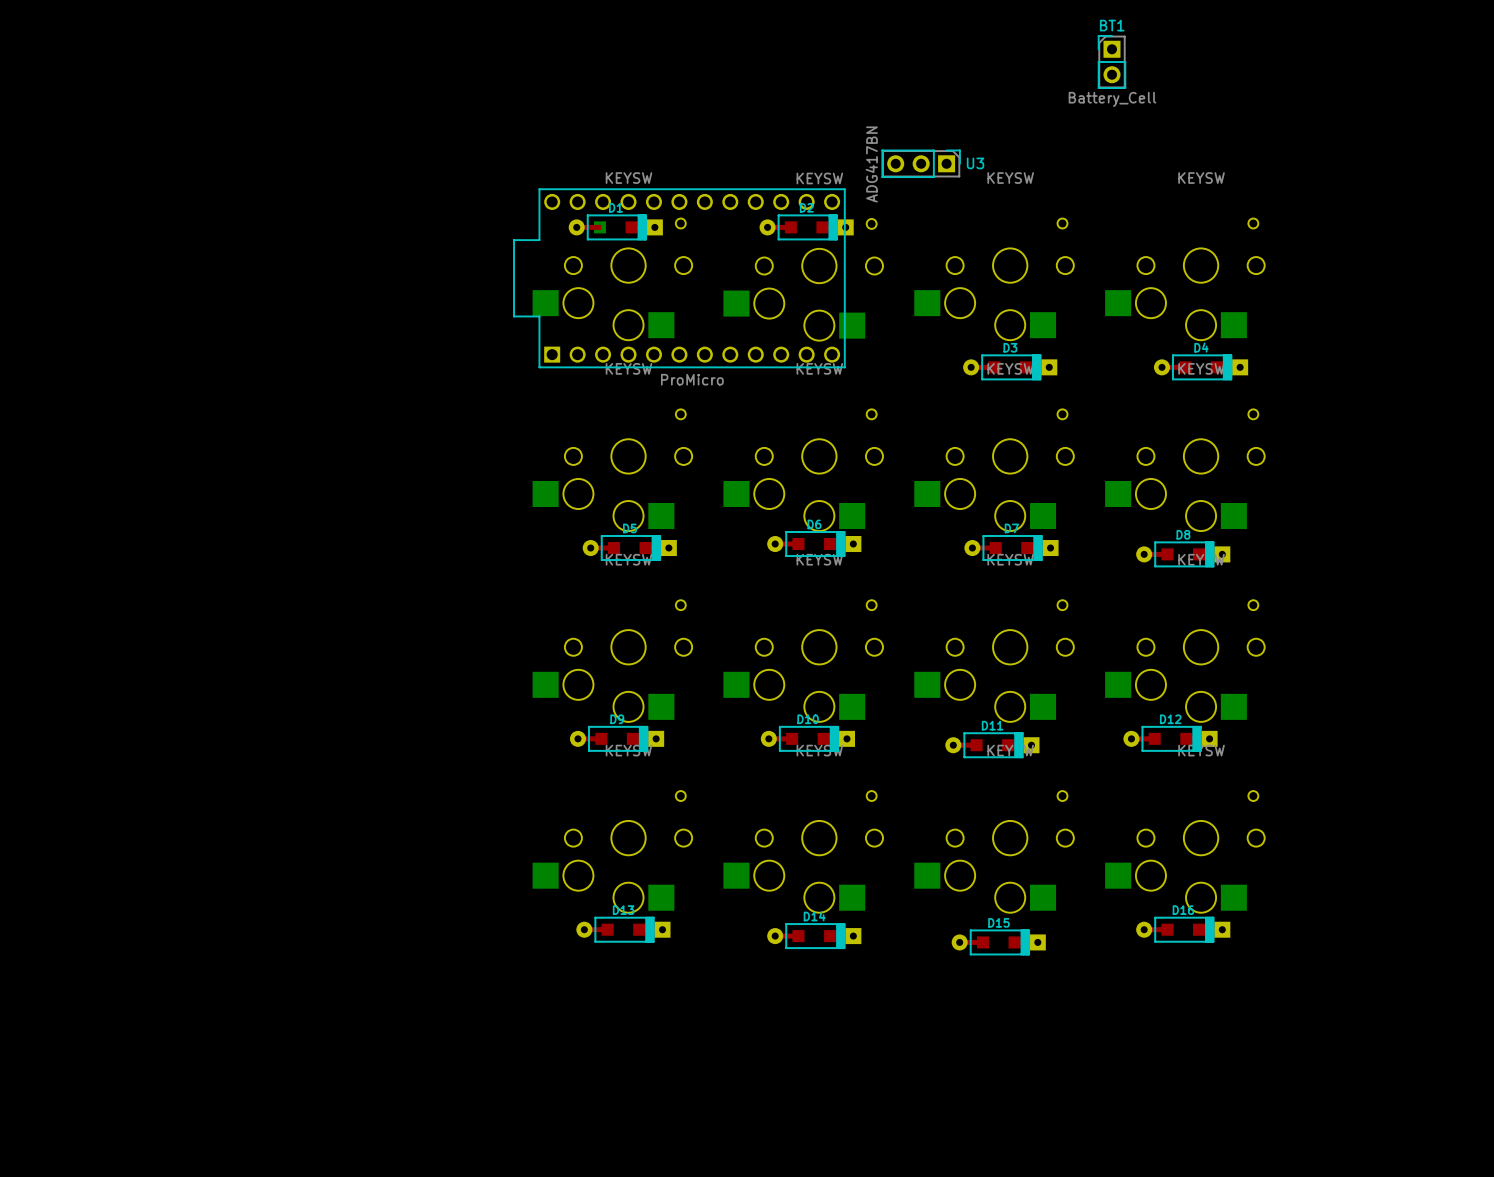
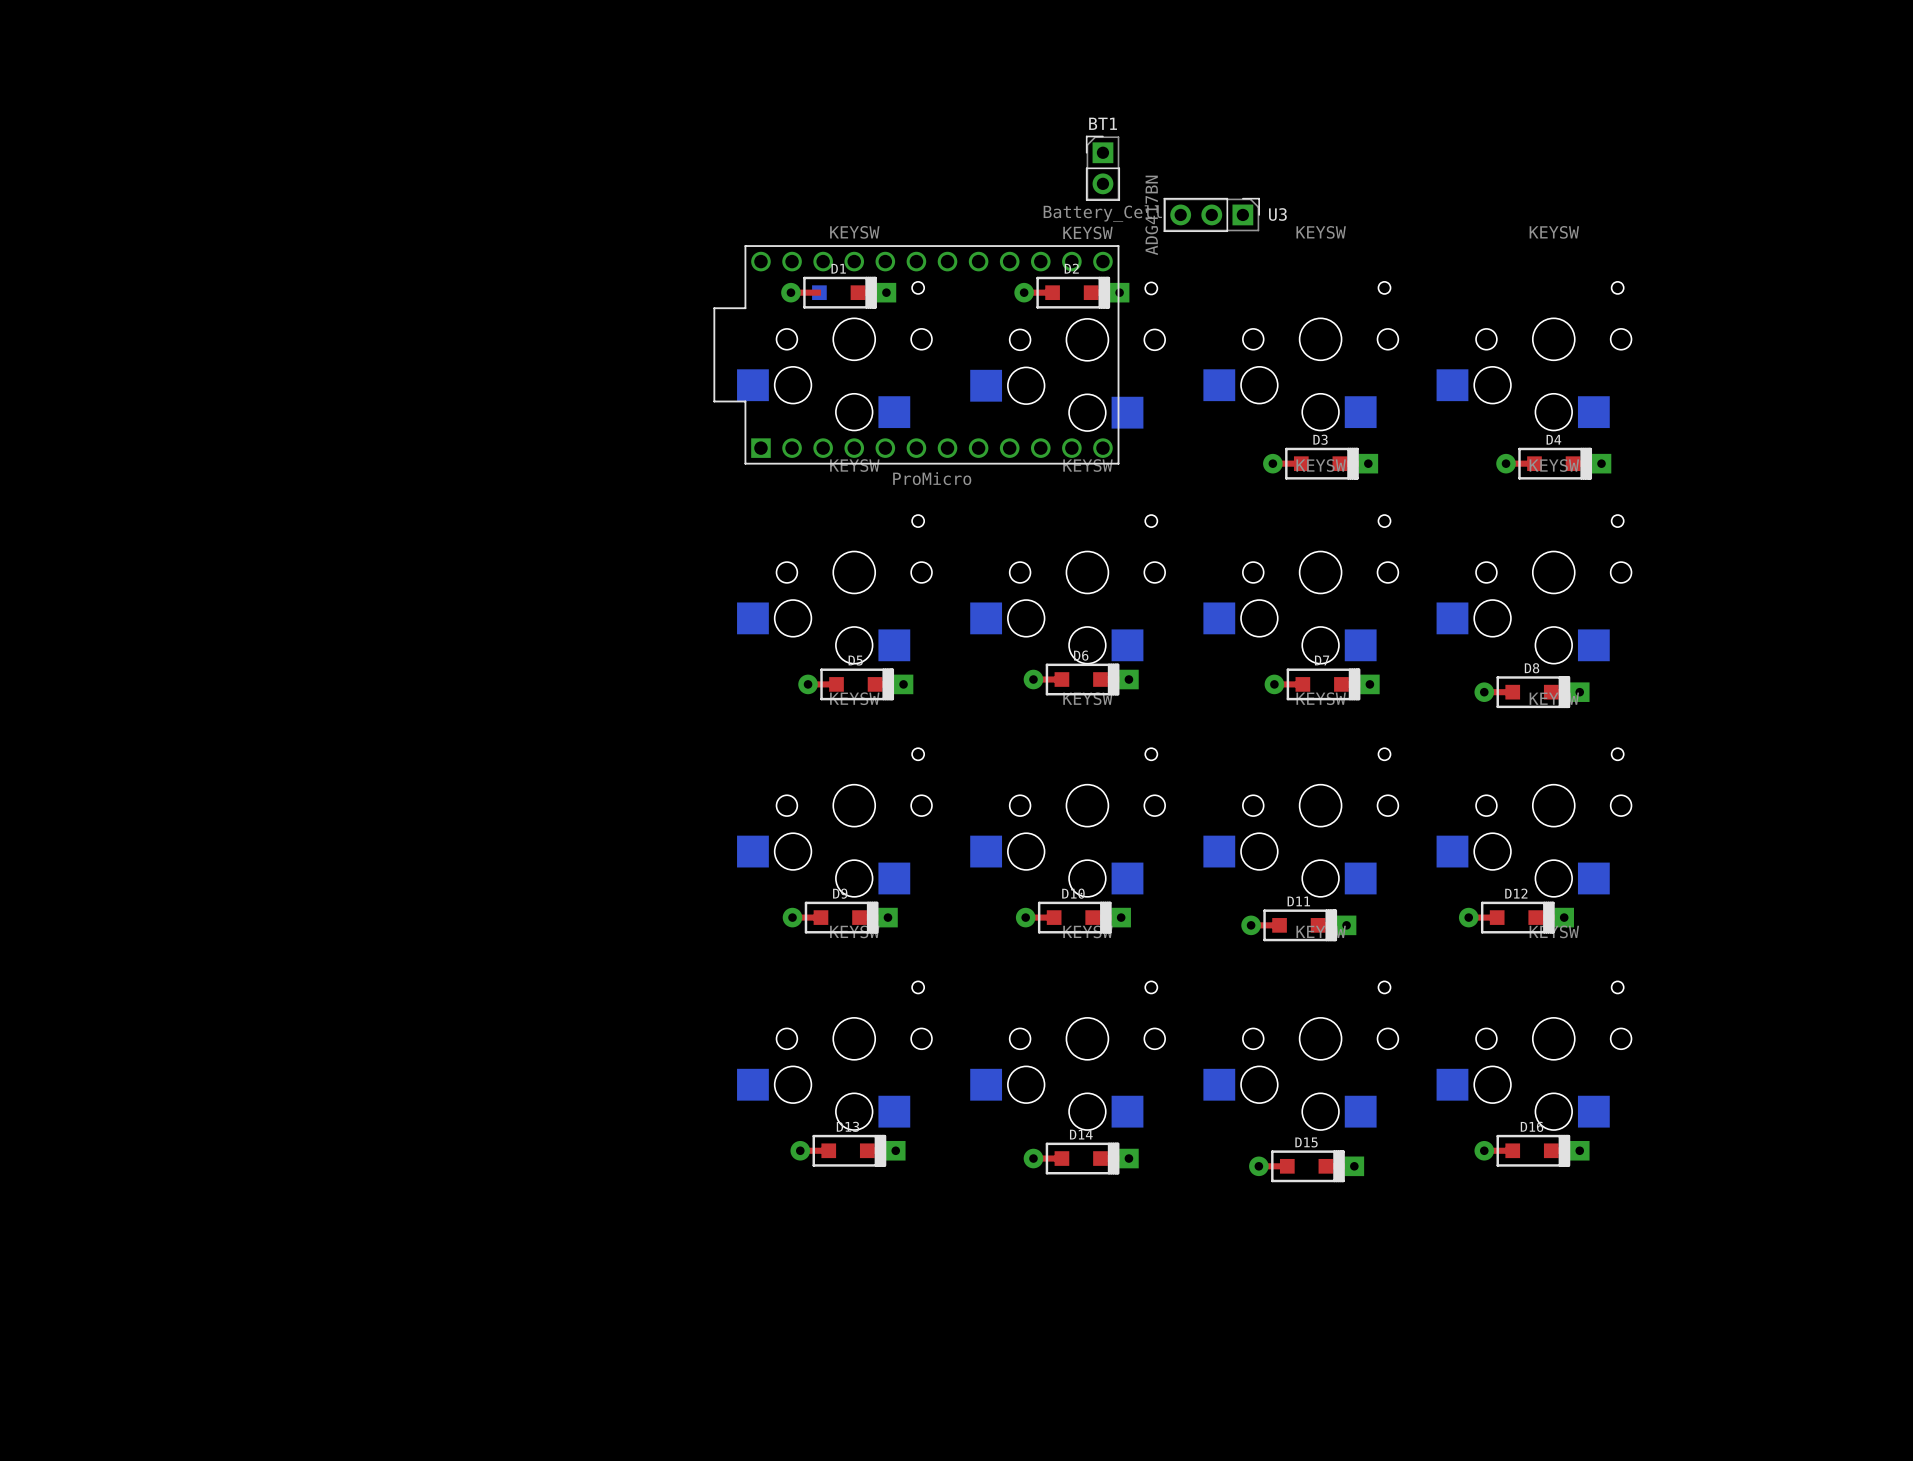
BT1 position: (1111, 62) -> (1102, 168)

